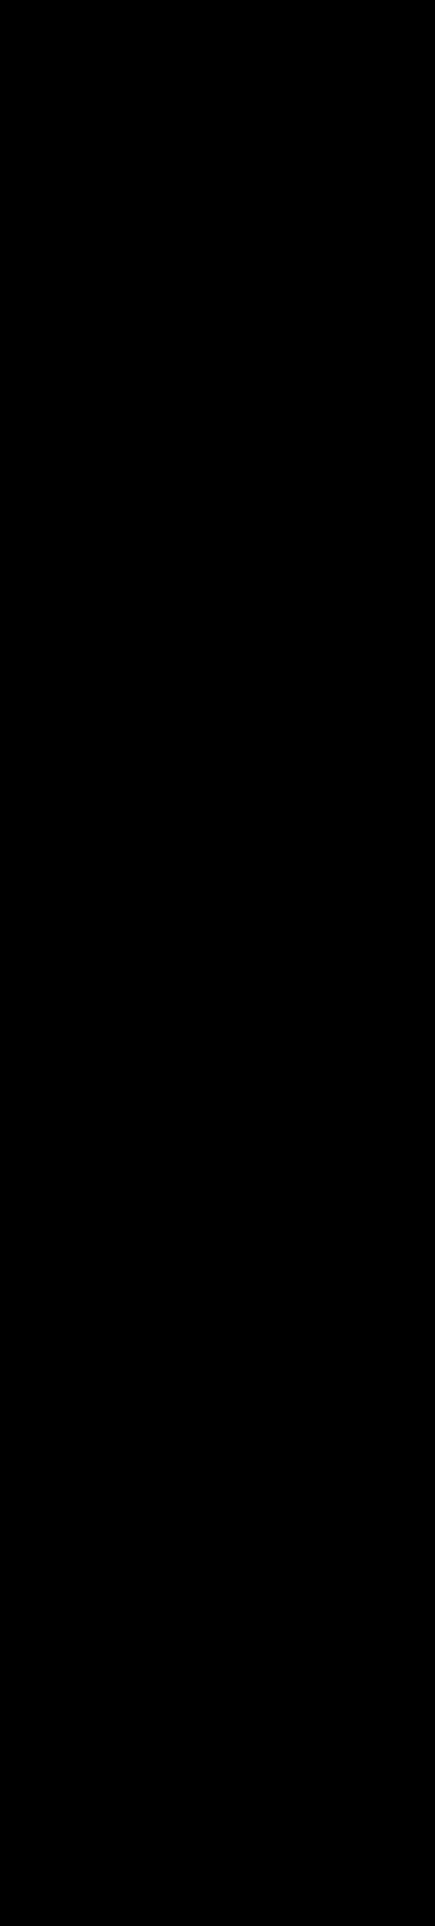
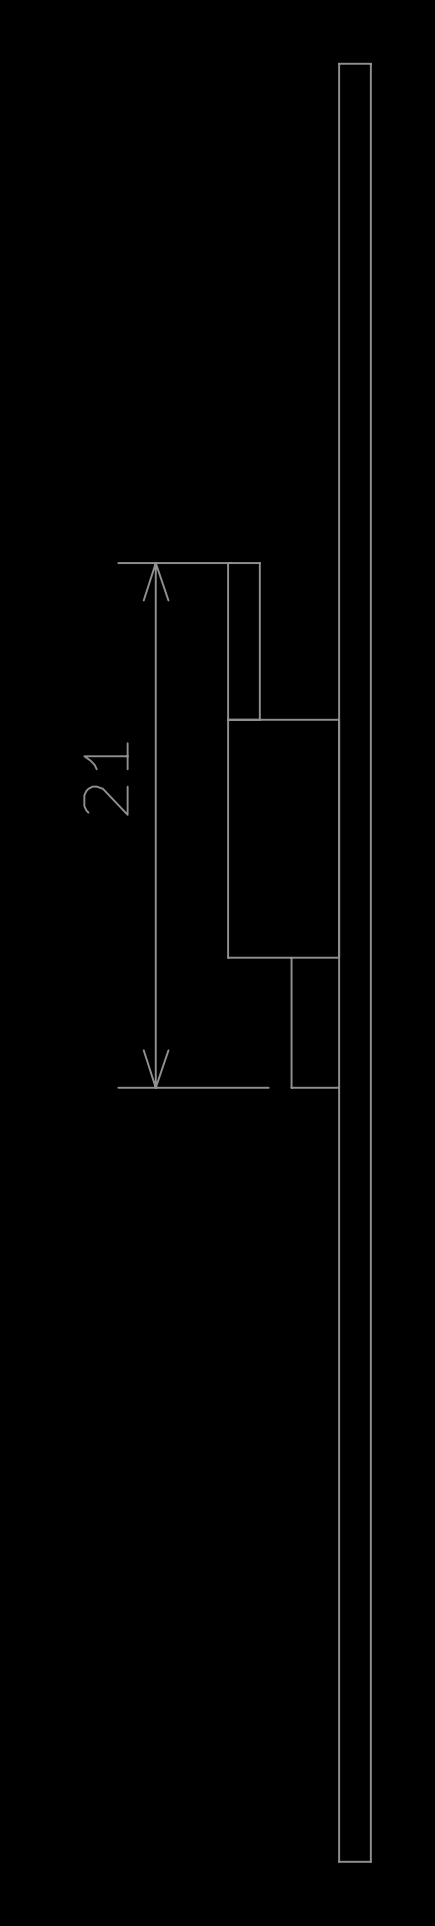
line: none -> (370, 63) (339, 63) (339, 1861) (370, 1861) (370, 63)
line: none -> (118, 563) (259, 563) (259, 719)
line: none -> (155, 563) (155, 1087)
line: none -> (155, 563) (168, 600)
line: none -> (155, 563) (143, 600)
line: none -> (228, 563) (228, 957) (339, 957)
line: none -> (339, 719) (228, 719)
text: none -> 21 (105, 779)
line: none -> (291, 957) (291, 1087) (339, 1087)
line: none -> (143, 1050) (155, 1087)
line: none -> (168, 1050) (155, 1087)
line: none -> (268, 1087) (118, 1087)

